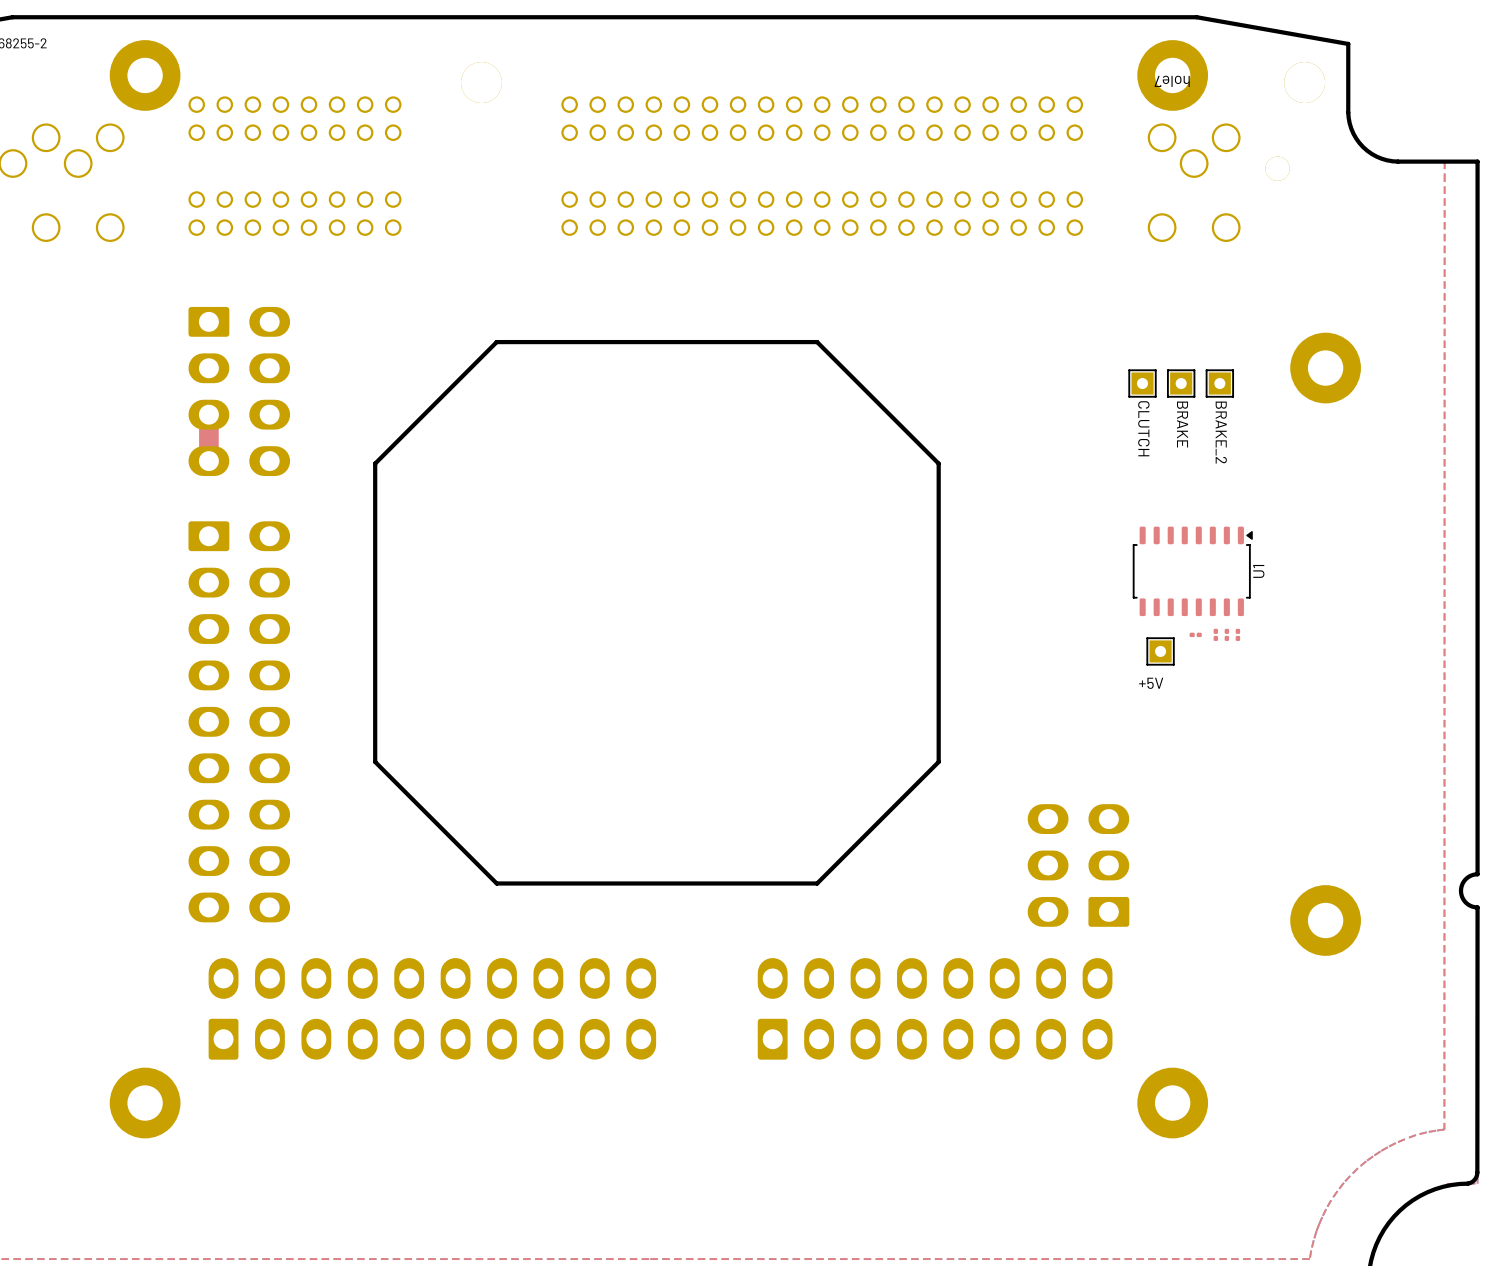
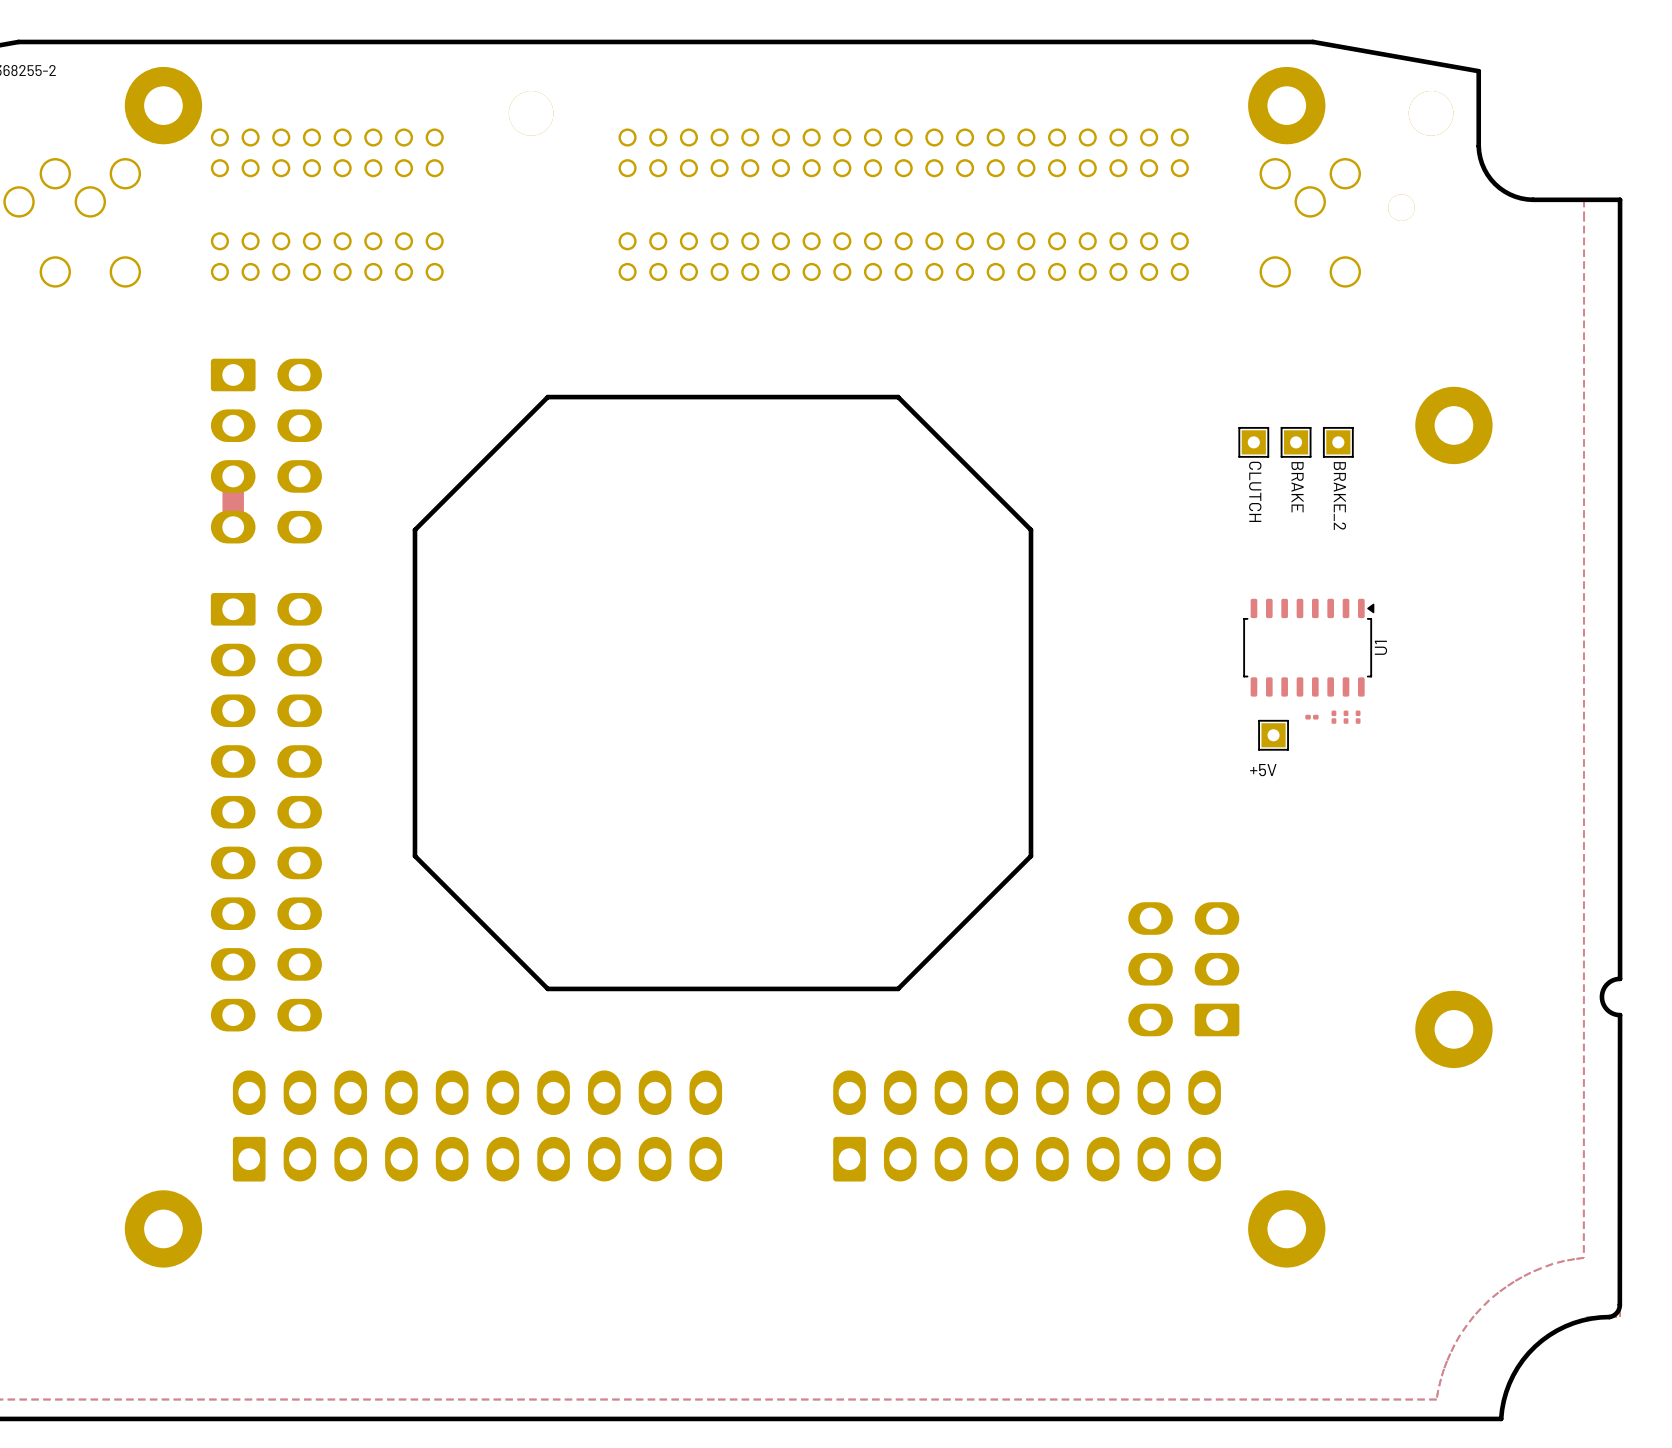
hole7 name: hole7 (1172, 81) -> none

